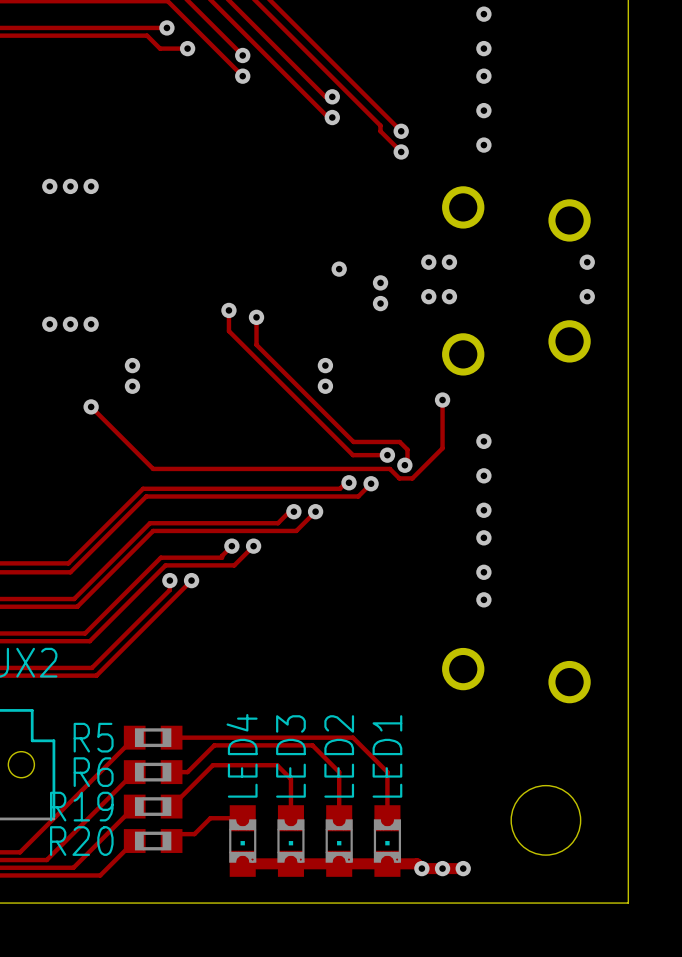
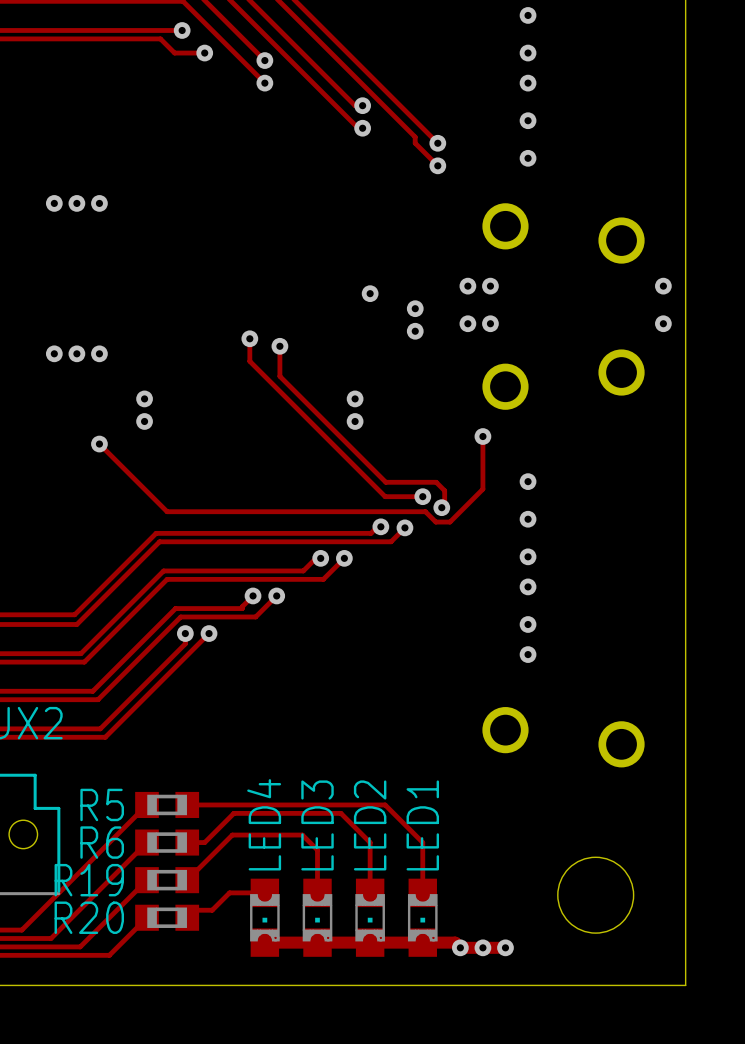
via: (587, 262) -> none
via: none -> (663, 286)
via: (587, 296) -> none
via: none -> (663, 323)

